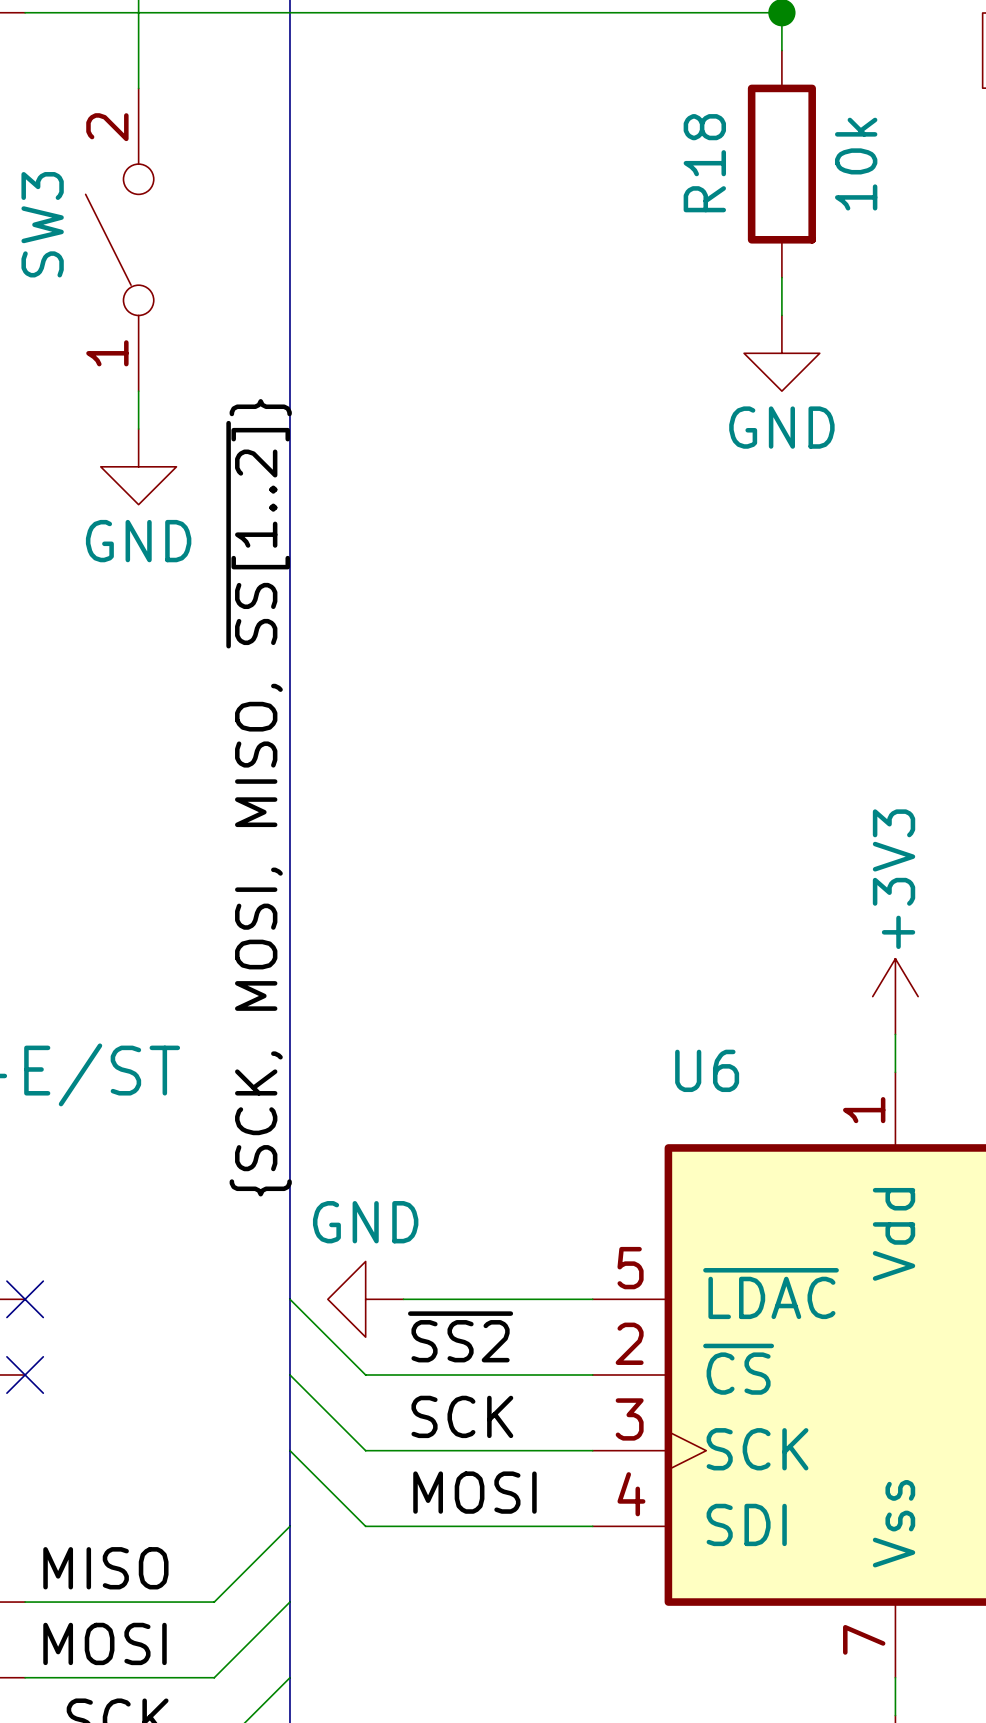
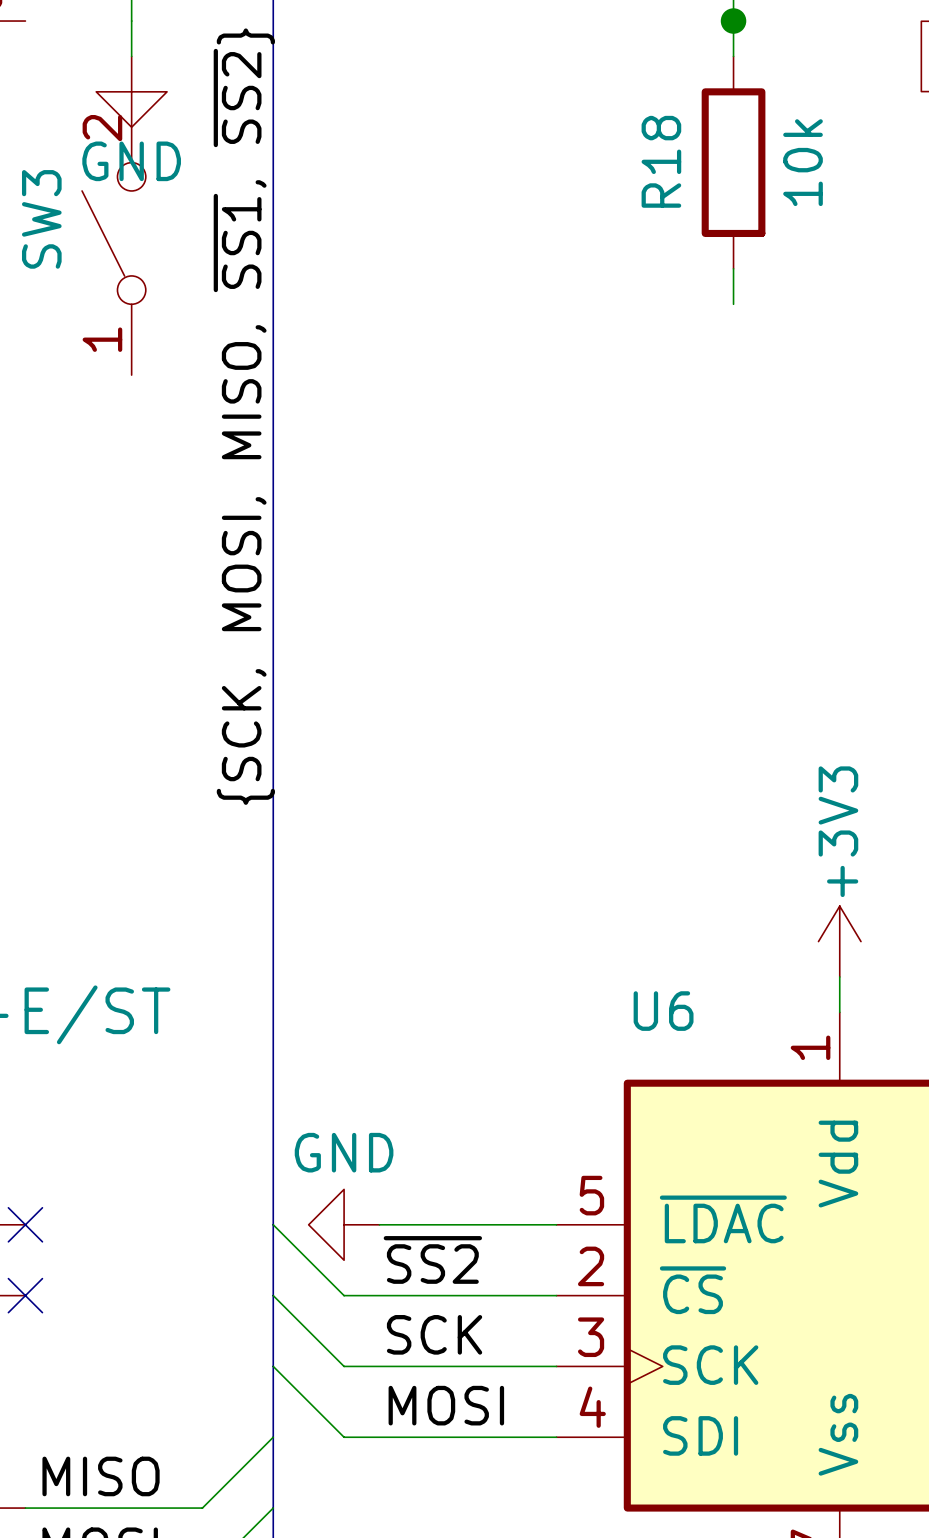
wire: (25, 12) (781, 12) -> none
power symbol: none -> GND (131, 91)
power symbol: GND (781, 353) -> none
wire: (138, 391) (138, 428) -> none
power symbol: GND (138, 466) -> none
label: {SCK, MOSI, MISO, ~{SS[1..2]}} (259, 797) -> {SCK, MOSI, MISO, ~{SS1}, ~{SS2}} (244, 416)

